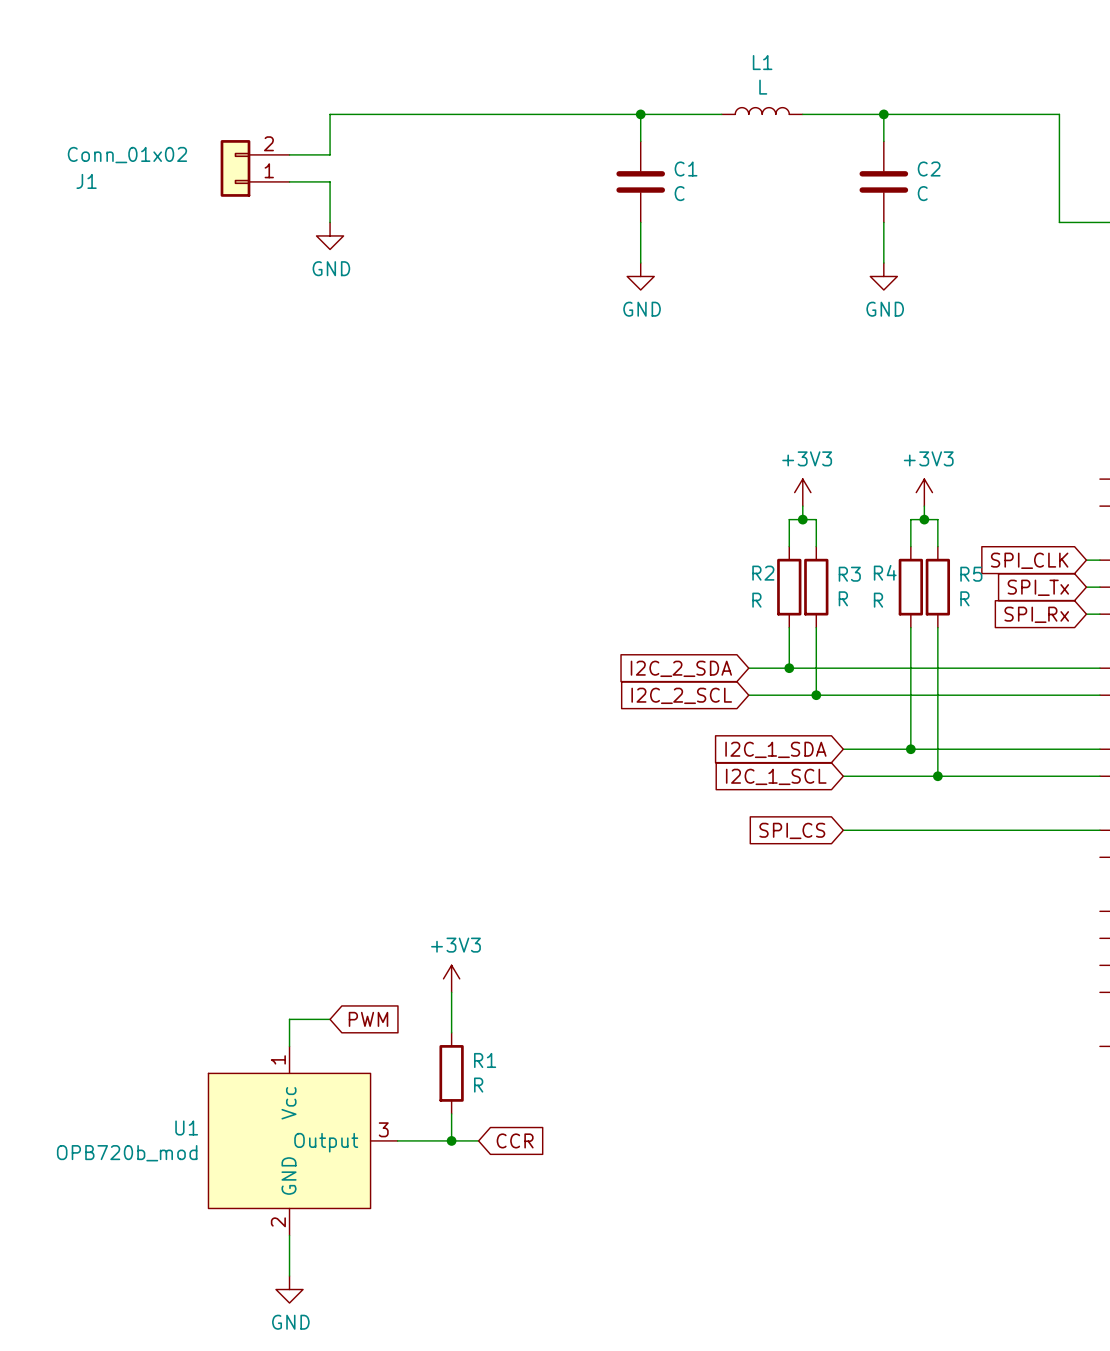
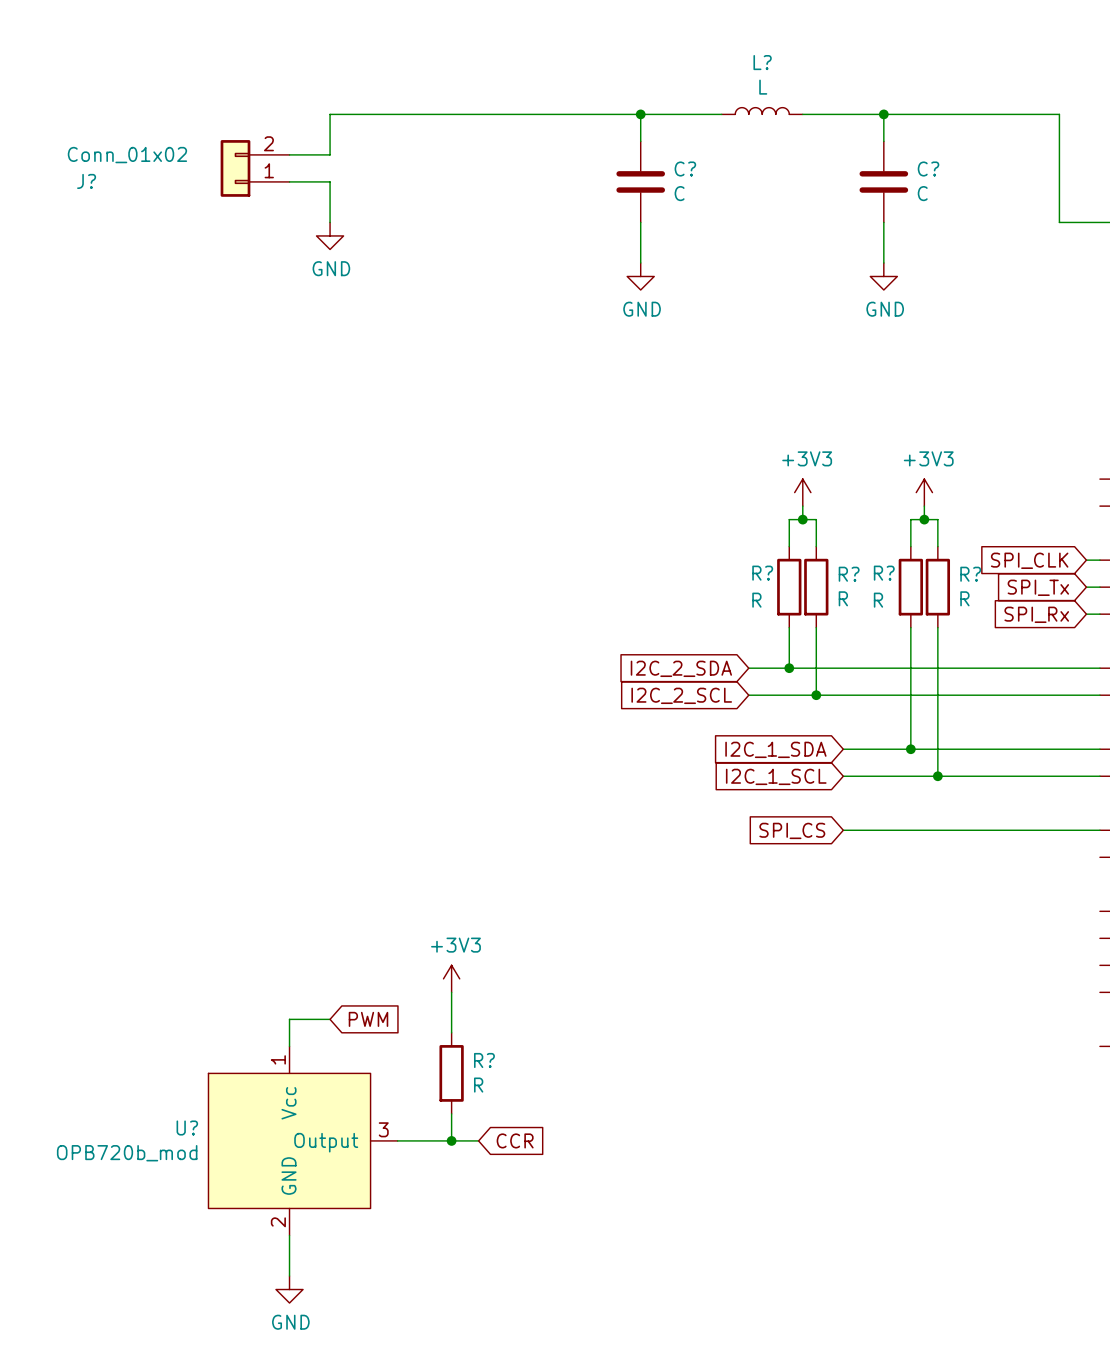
L1 name: L1 (762, 62) -> L? (762, 62)
C1 name: C1 (686, 169) -> C? (685, 169)
C2 name: C2 (929, 169) -> C? (928, 169)
J1 name: J1 (86, 181) -> J? (86, 181)
R4 name: R4 (885, 572) -> R? (884, 573)
R2 name: R2 (763, 573) -> R? (762, 573)
R3 name: R3 (849, 574) -> R? (849, 574)
R5 name: R5 (971, 574) -> R? (970, 574)
R1 name: R1 (485, 1060) -> R? (484, 1060)
U1 name: U1 (186, 1128) -> U? (187, 1128)

